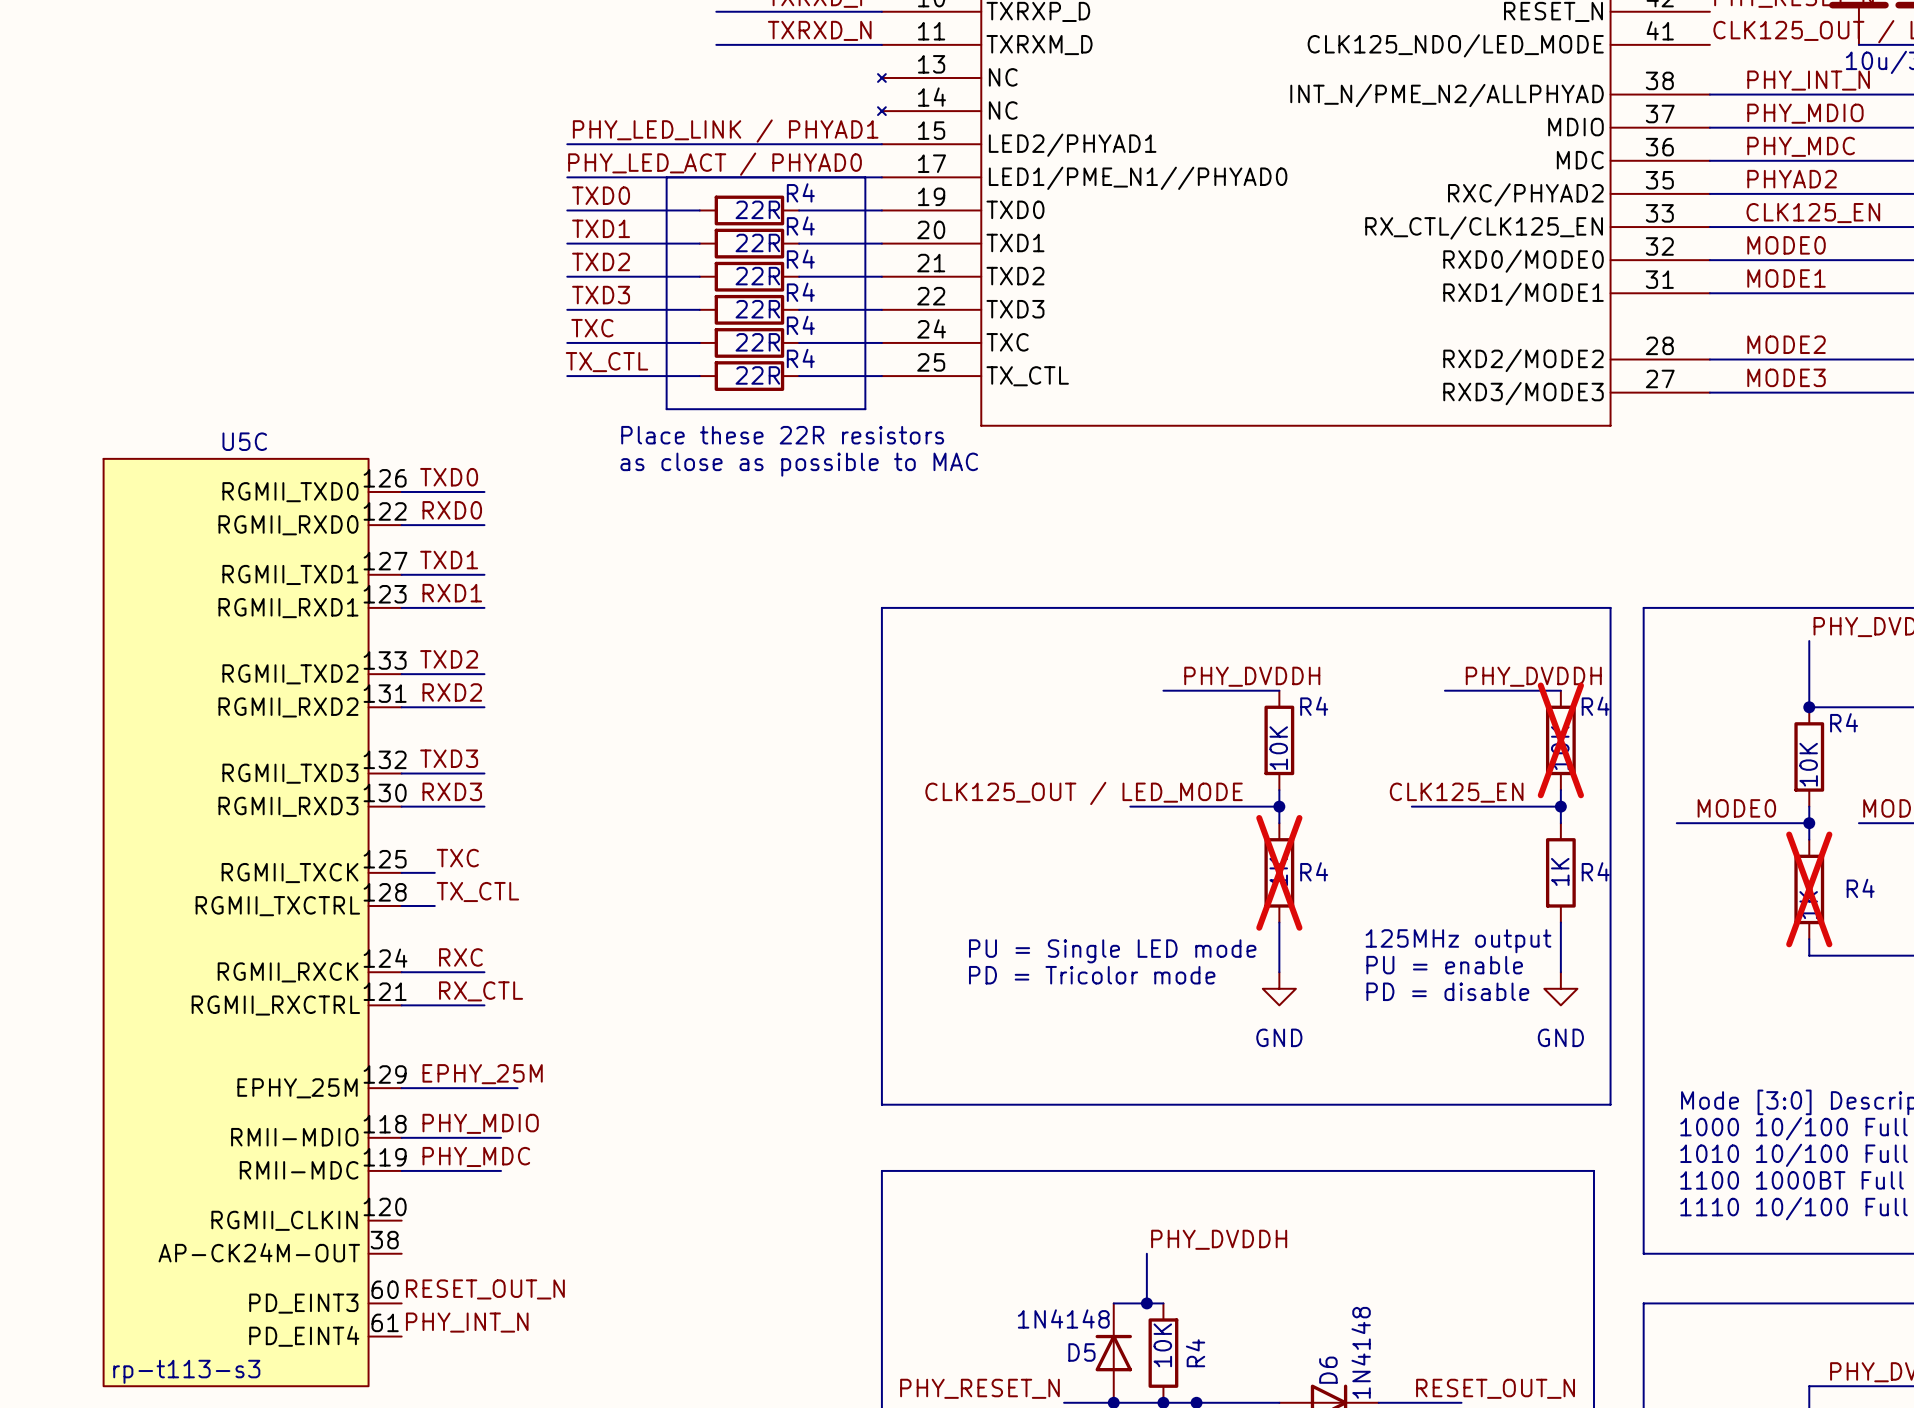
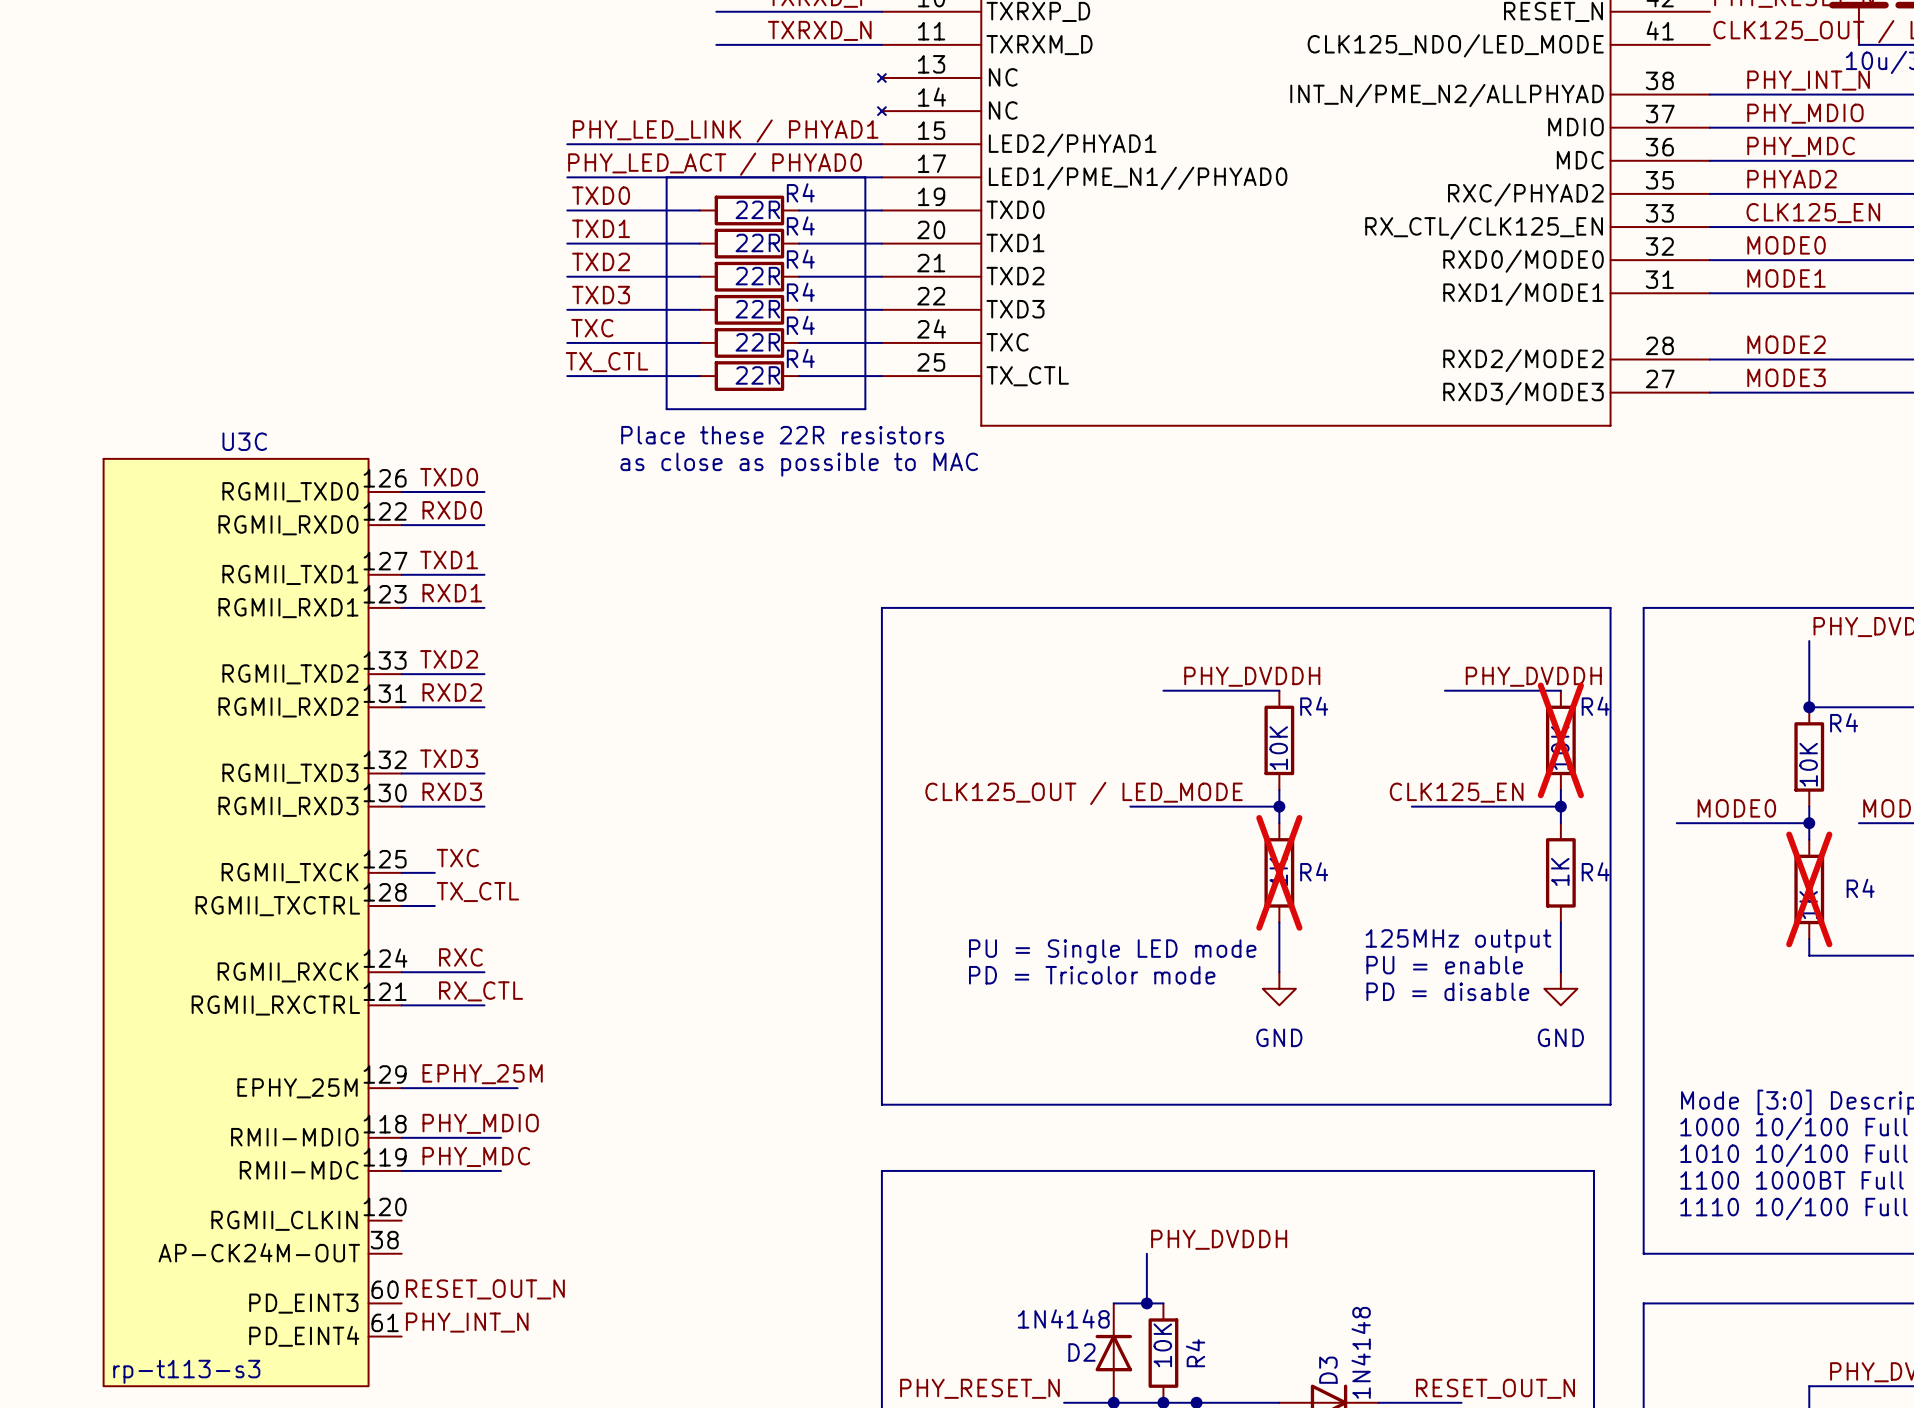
U5C name: U5C (244, 441) -> U3C (244, 441)
D5 name: D5 (1081, 1352) -> D2 (1081, 1352)
D6 name: D6 (1328, 1370) -> D3 (1328, 1370)

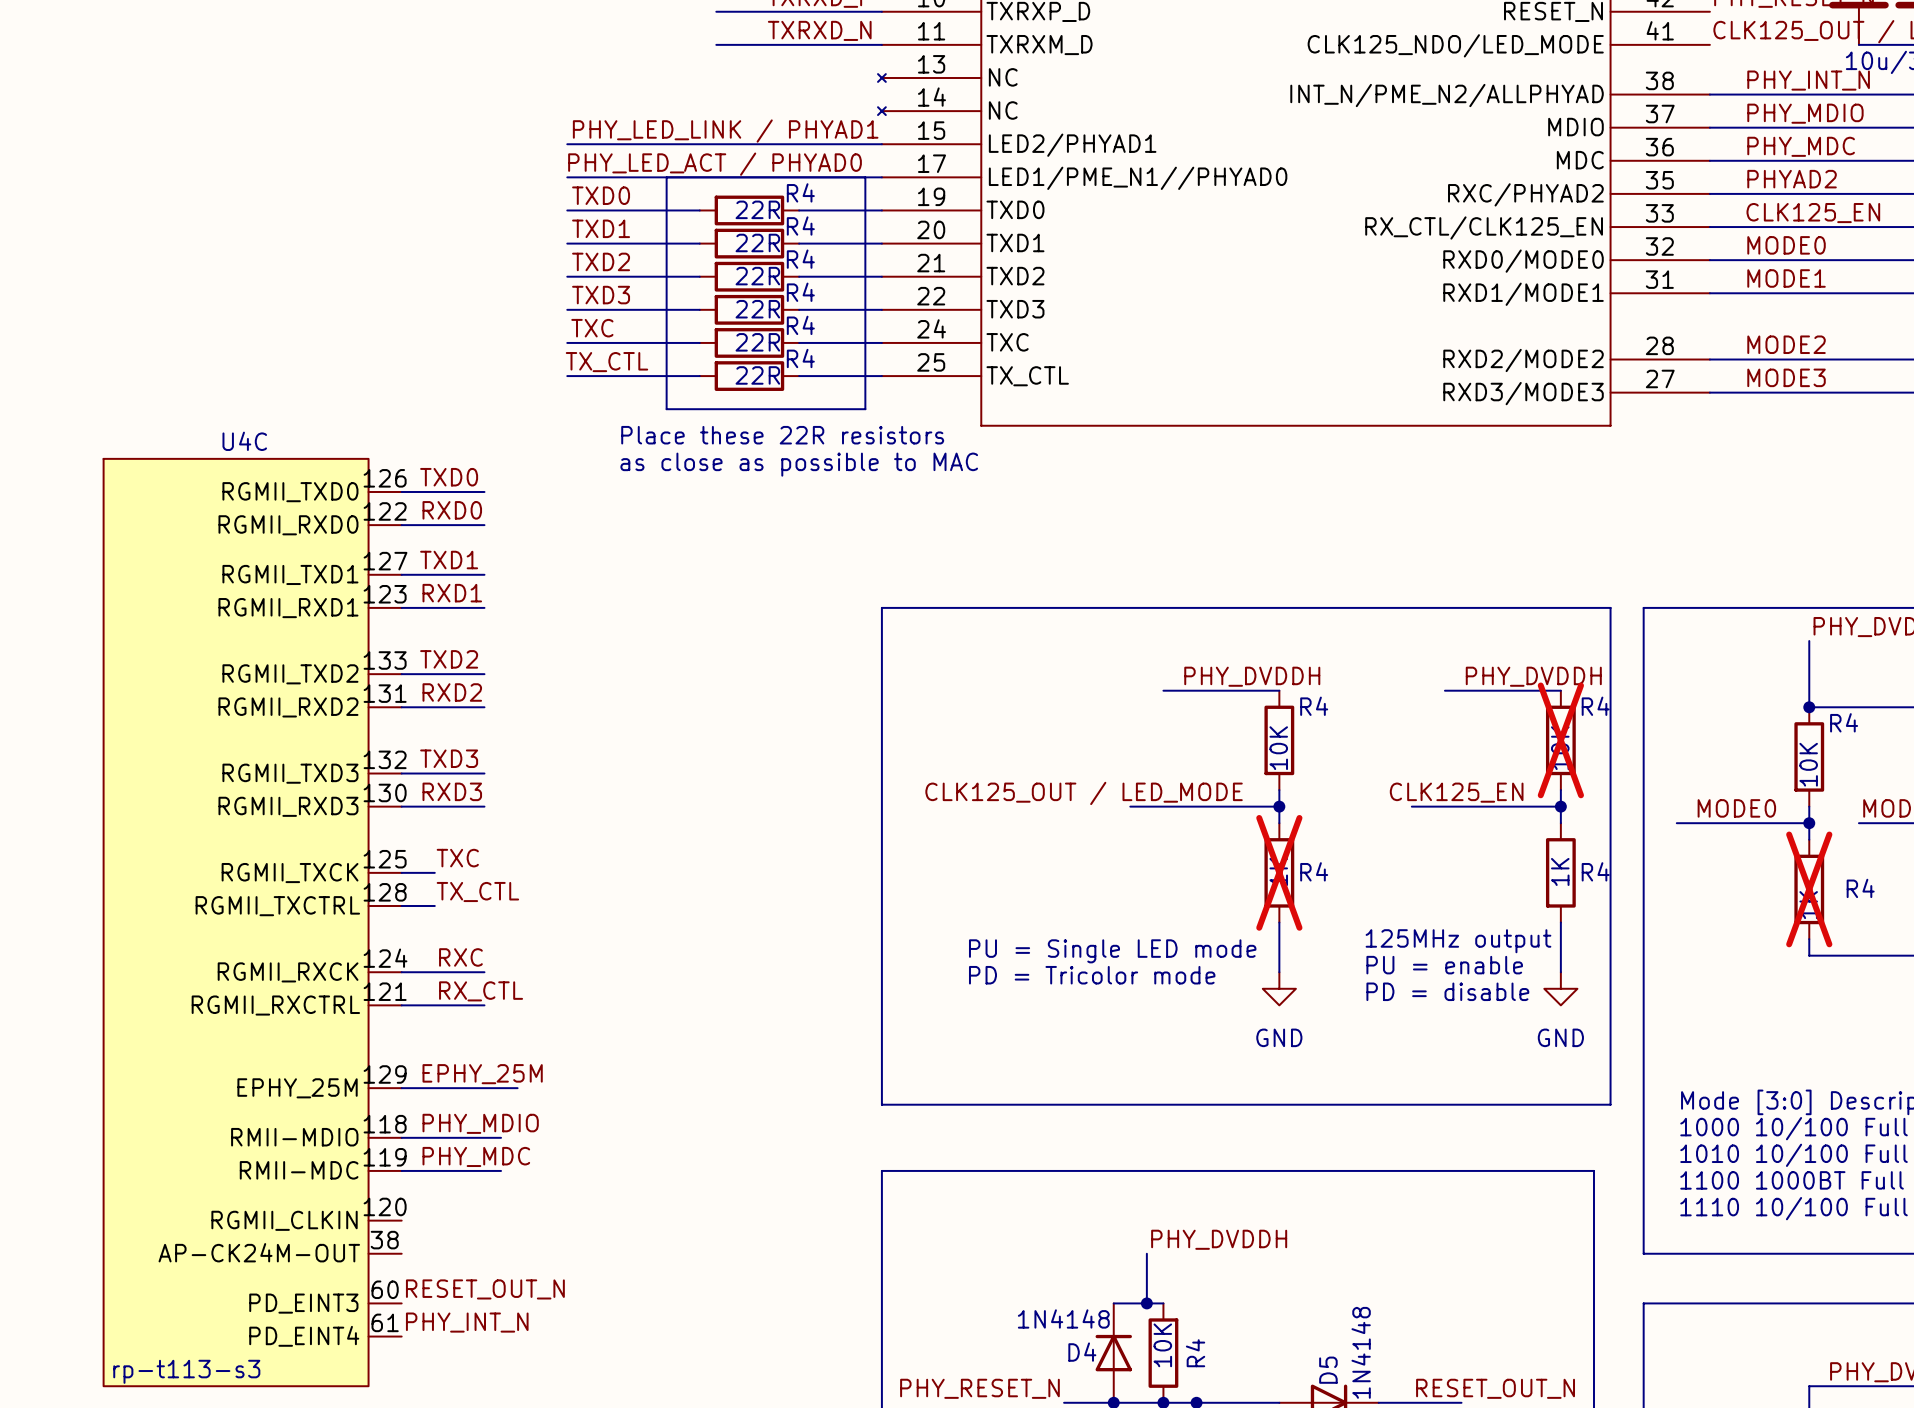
U3C name: U3C (244, 441) -> U4C (244, 441)
D2 name: D2 (1081, 1352) -> D4 (1082, 1352)
D3 name: D3 (1328, 1370) -> D5 (1328, 1370)

